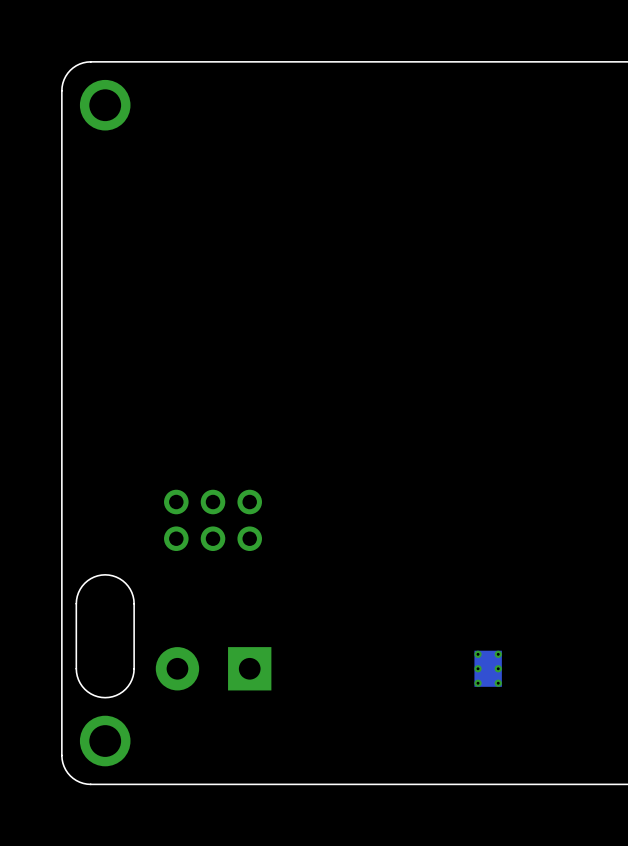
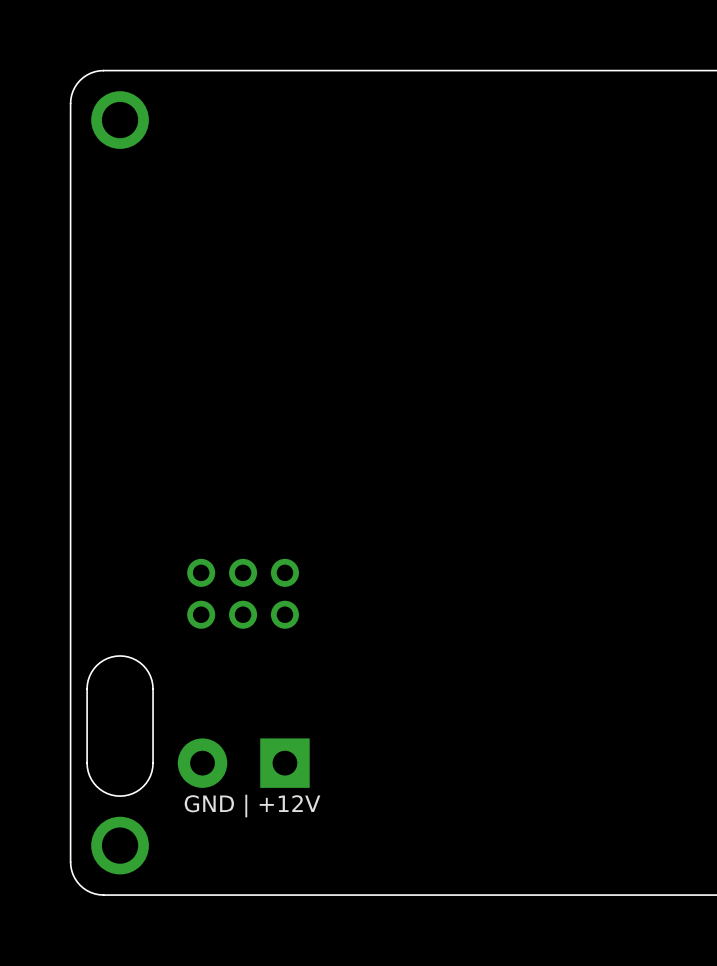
part: (488, 668) -> none
text: none -> GND | +12V (252, 806)

